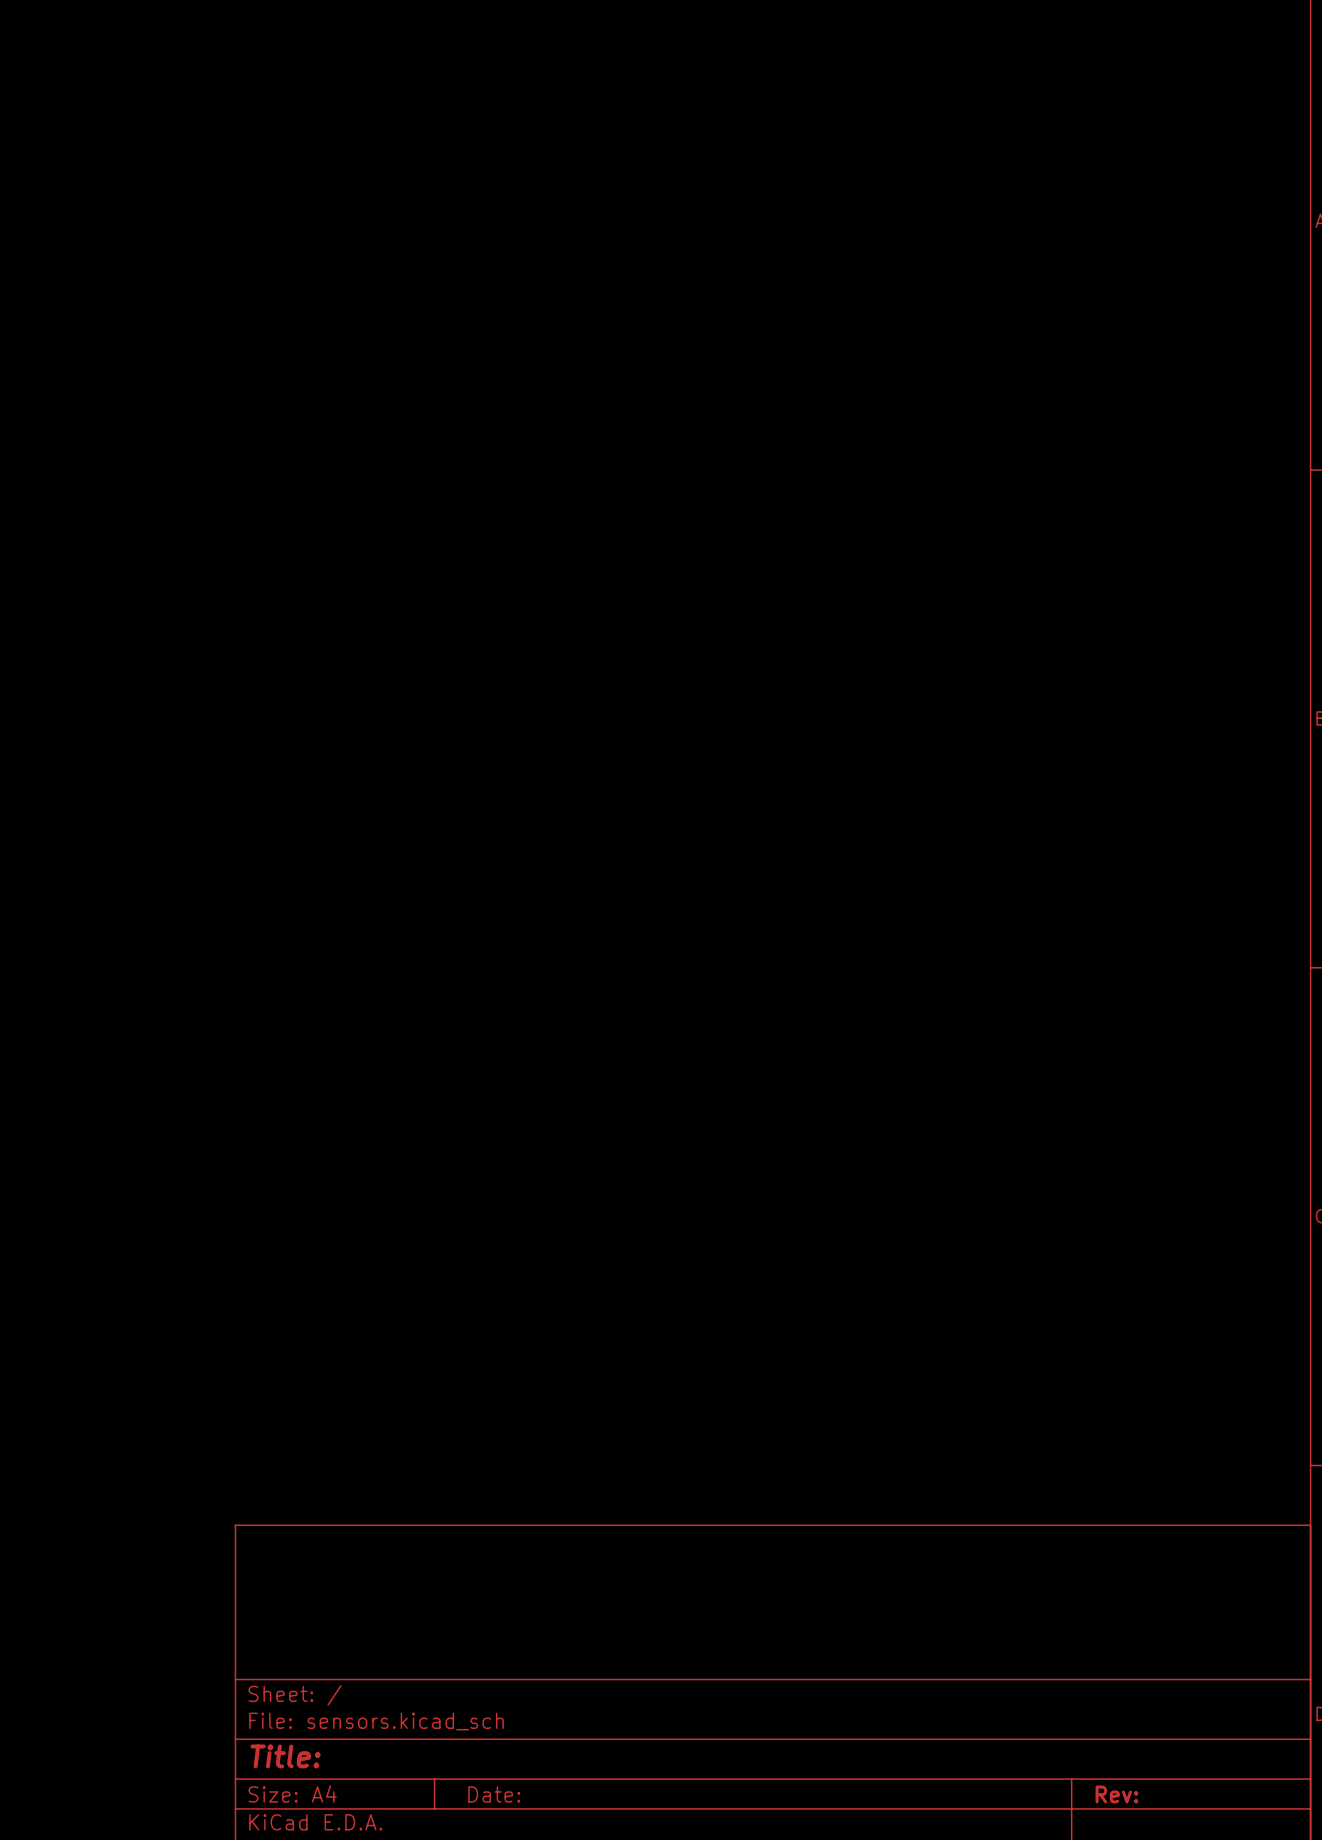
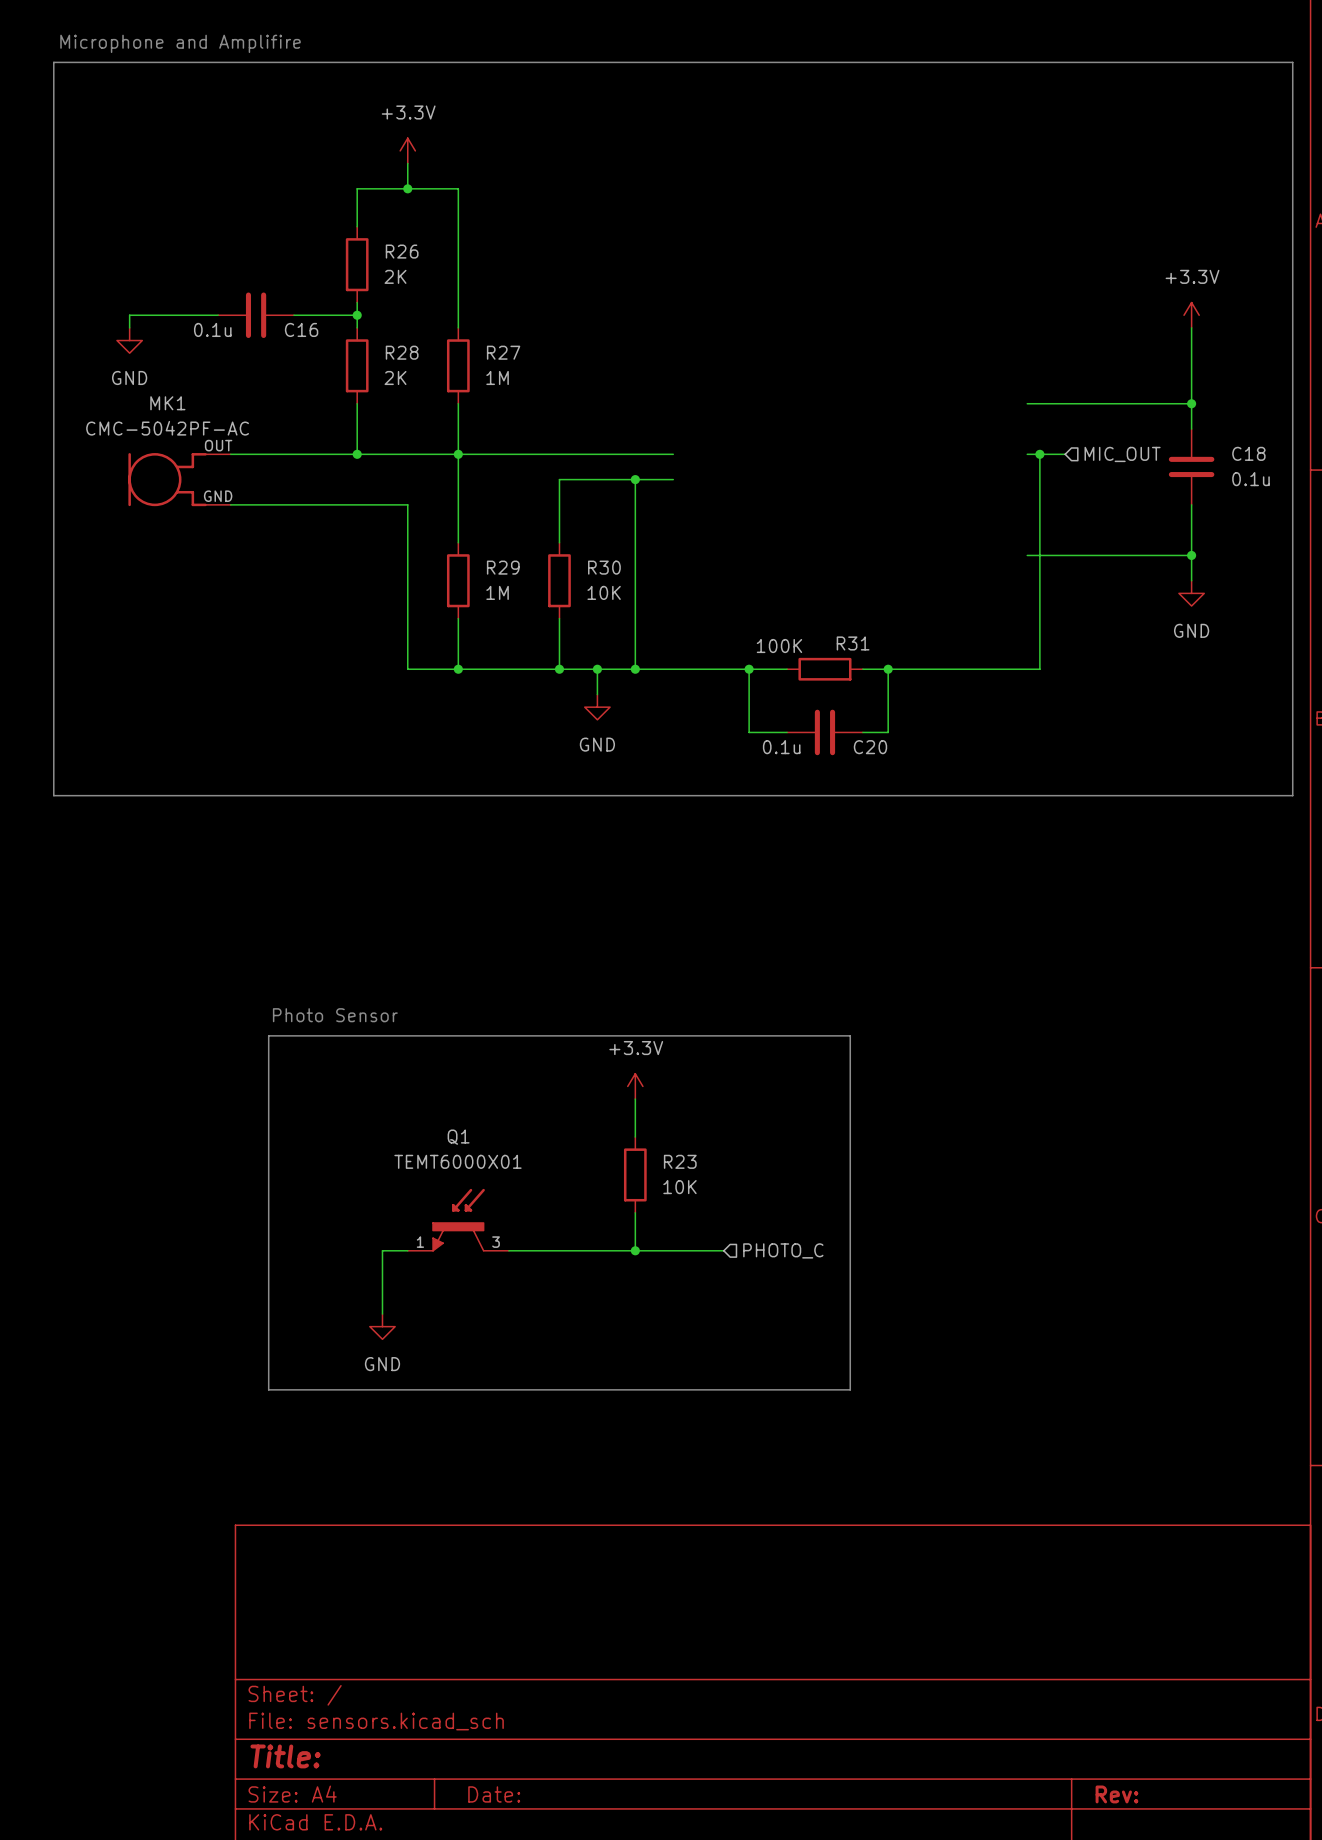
text: none -> Microphone and Amplifire (180, 43)
line: none -> (53, 62) (1292, 62) (1292, 795) (53, 795) (53, 62)
power symbol: none -> +3.3V (407, 150)
wire: none -> (407, 163) (407, 188)
junction: none -> (407, 188)
wire: none -> (357, 226) (357, 188) (458, 188) (458, 327)
R26: none -> 2K (357, 264)
wire: none -> (357, 302) (357, 327)
wire: none -> (218, 315) (129, 315) (129, 327)
C16: none -> 0.1u (256, 315)
wire: none -> (293, 315) (357, 315)
junction: none -> (357, 315)
power symbol: none -> +3.3V (1191, 315)
wire: none -> (1191, 327) (1191, 429)
power symbol: none -> GND (129, 340)
R28: none -> 2K (357, 365)
R27: none -> 1M (458, 365)
wire: none -> (357, 403) (357, 454)
wire: none -> (458, 403) (458, 542)
wire: none -> (1027, 403) (1191, 403)
junction: none -> (1191, 403)
wire: none -> (230, 454) (673, 454)
junction: none -> (357, 454)
junction: none -> (458, 454)
wire: none -> (1027, 454) (1065, 454)
wire: none -> (1039, 454) (1039, 669) (862, 669)
junction: none -> (1039, 454)
hierarchical label: none -> MIC_OUT (1122, 454)
C18: none -> 0.1u (1191, 466)
MK1: none -> CMC-5042PF-AC (179, 479)
wire: none -> (635, 479) (635, 669)
junction: none -> (635, 479)
wire: none -> (673, 479) (559, 479) (559, 542)
wire: none -> (230, 504) (407, 504) (407, 669) (787, 669)
wire: none -> (1191, 504) (1191, 580)
wire: none -> (1027, 555) (1191, 555)
junction: none -> (1191, 555)
R29: none -> 1M (458, 580)
R30: none -> 10K (559, 580)
power symbol: none -> GND (1191, 593)
wire: none -> (458, 618) (458, 669)
wire: none -> (559, 618) (559, 669)
junction: none -> (458, 669)
junction: none -> (559, 669)
wire: none -> (597, 669) (597, 694)
junction: none -> (597, 669)
junction: none -> (635, 669)
wire: none -> (749, 669) (749, 732) (787, 732)
junction: none -> (749, 669)
R31: none -> 100K (824, 669)
wire: none -> (888, 669) (888, 732) (862, 732)
junction: none -> (888, 669)
power symbol: none -> GND (597, 707)
C20: none -> 0.1u (824, 732)
text: none -> Photo Sensor (335, 1015)
line: none -> (268, 1035) (850, 1035) (850, 1389) (268, 1389) (268, 1035)
power symbol: none -> +3.3V (635, 1086)
wire: none -> (635, 1099) (635, 1137)
R23: none -> 10K (635, 1174)
wire: none -> (635, 1212) (635, 1250)
Q1: none -> TEMT6000X01 (458, 1220)
wire: none -> (407, 1250) (382, 1250) (382, 1314)
wire: none -> (508, 1250) (723, 1250)
junction: none -> (635, 1250)
hierarchical label: none -> PHOTO_C (783, 1250)
power symbol: none -> GND (382, 1326)

